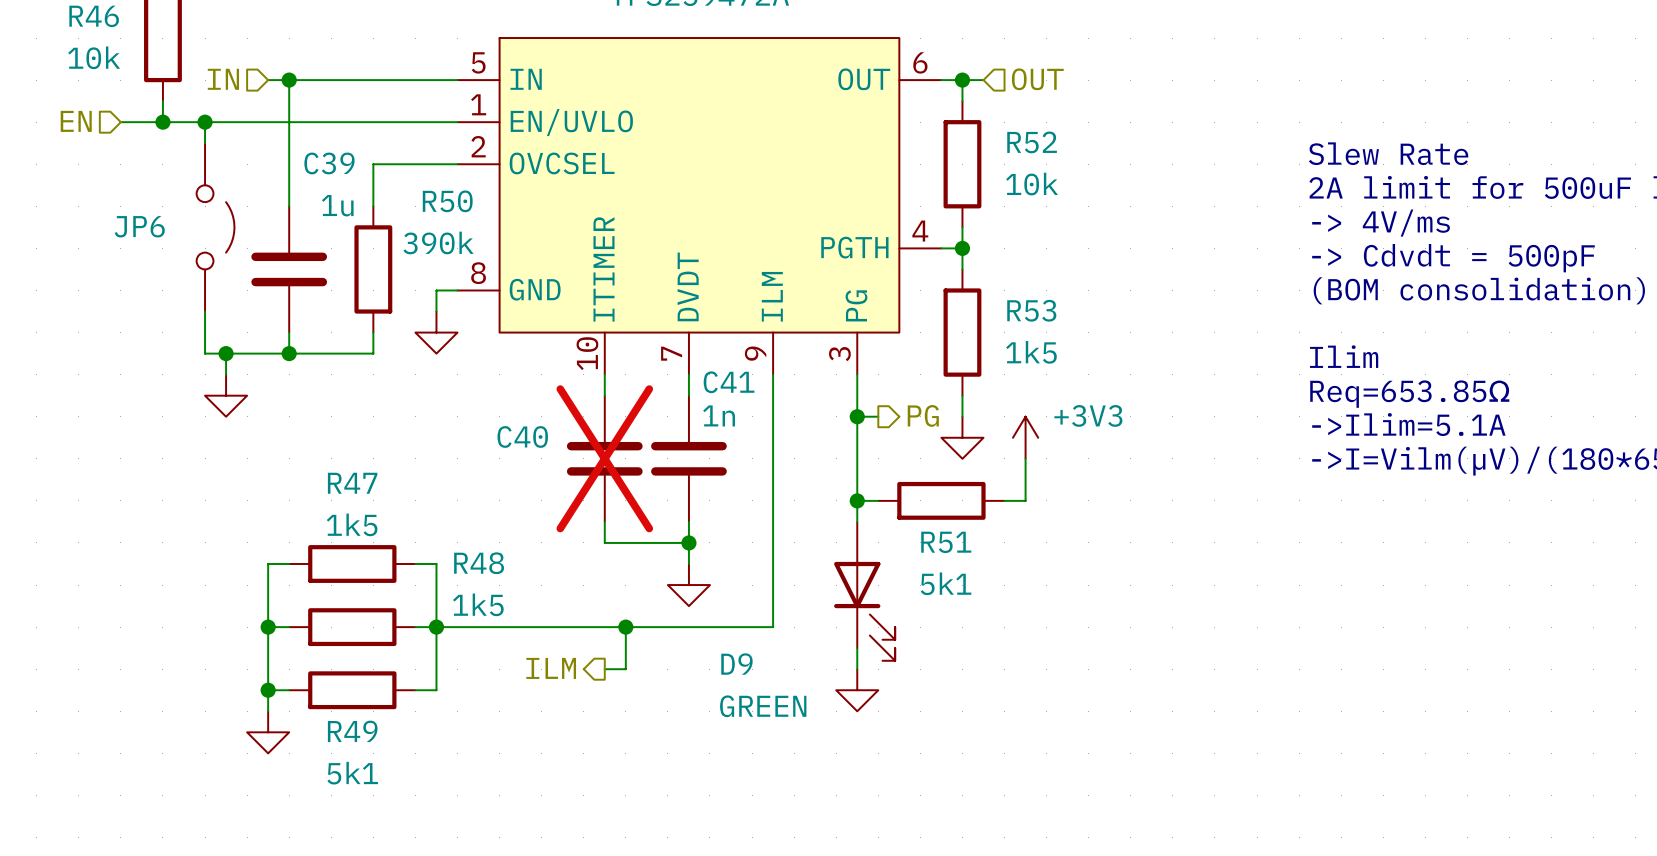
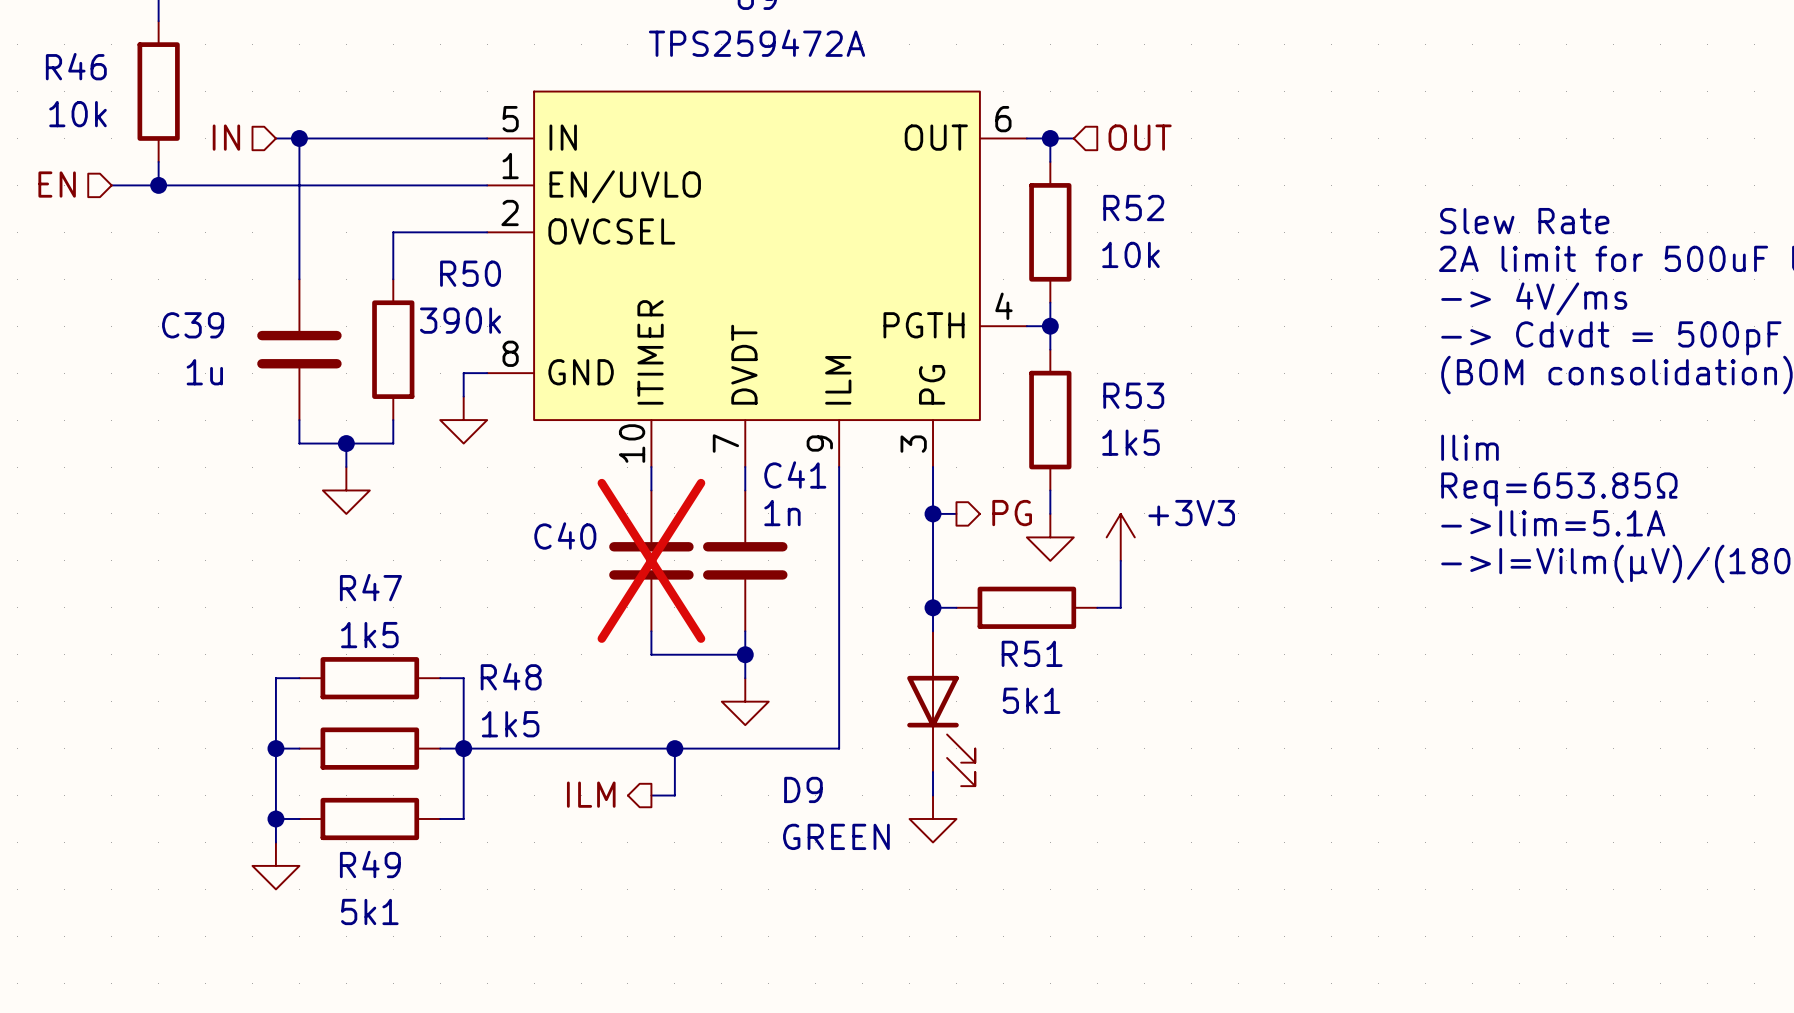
wire: (205, 122) (205, 143) -> none
junction: (205, 122) -> none
C39 name position: C39 (329, 163) -> C39 (193, 325)
C39 value position: 1u (337, 205) -> 1u (204, 372)
JP6: (215, 227) -> none
wire: (205, 311) (205, 353) (289, 353) -> none
wire: (226, 353) (226, 374) -> (346, 443) (346, 467)
junction: (226, 353) -> none
junction position: (289, 353) -> (346, 443)
power symbol position: (226, 395) -> (346, 490)

